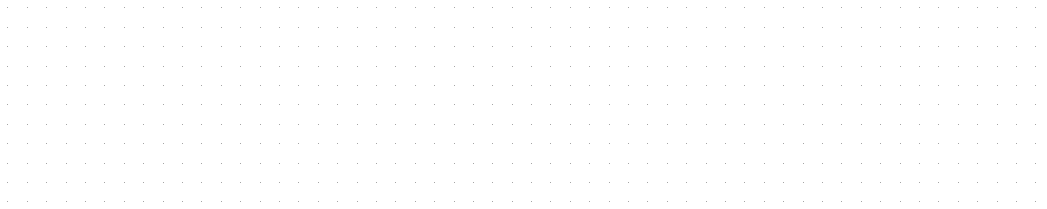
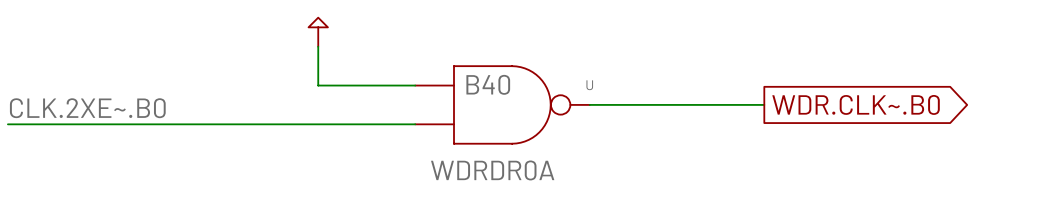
power symbol: none -> (318, 31)
wire: none -> (318, 46) (318, 85) (415, 85)
U: none -> (502, 104)
wire: none -> (589, 104) (764, 104)
global label: none -> WDR.CLK~.B0 (856, 104)
label: none -> CLK.2XE~.B0 (87, 108)
wire: none -> (7, 124) (415, 124)

